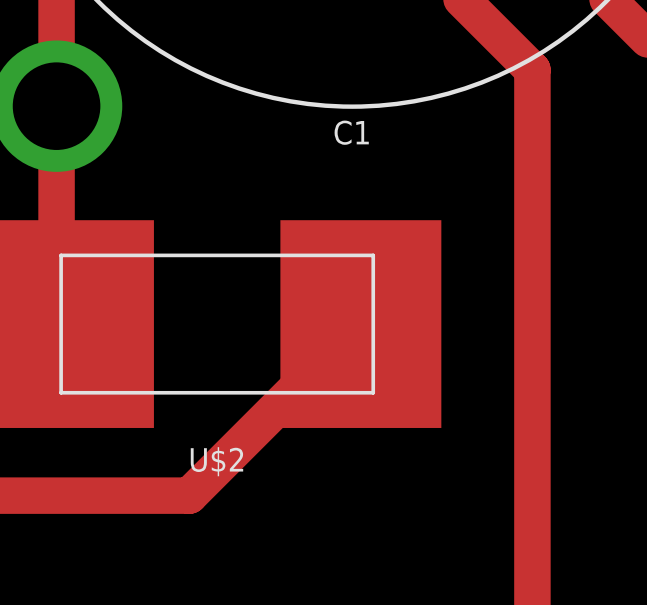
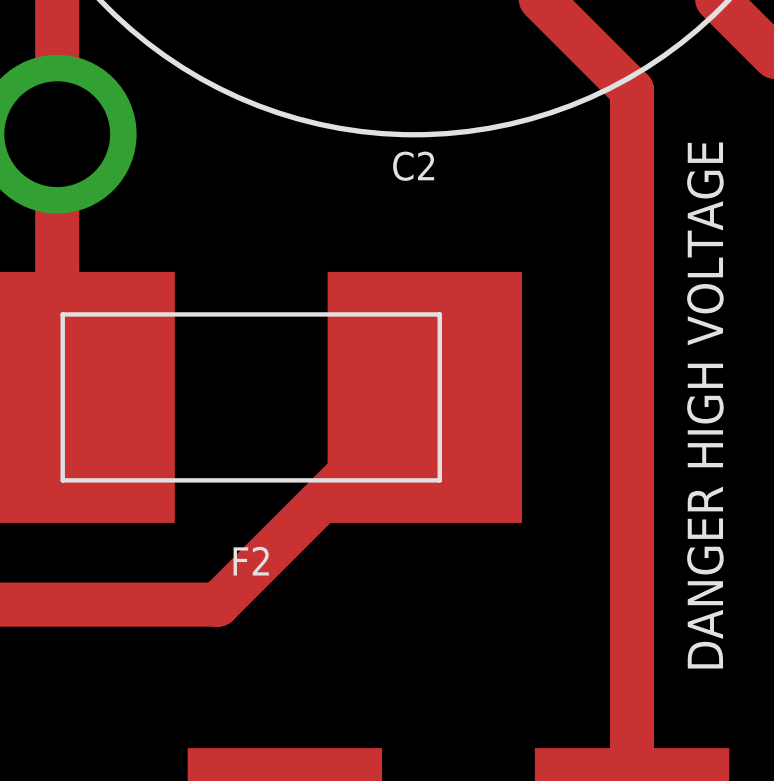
C1 name: C1 (351, 132) -> C2 (413, 166)
text: none -> DANGER HIGH VOLTAGE (705, 405)
U$2 name: U$2 (216, 461) -> F2 (251, 561)

